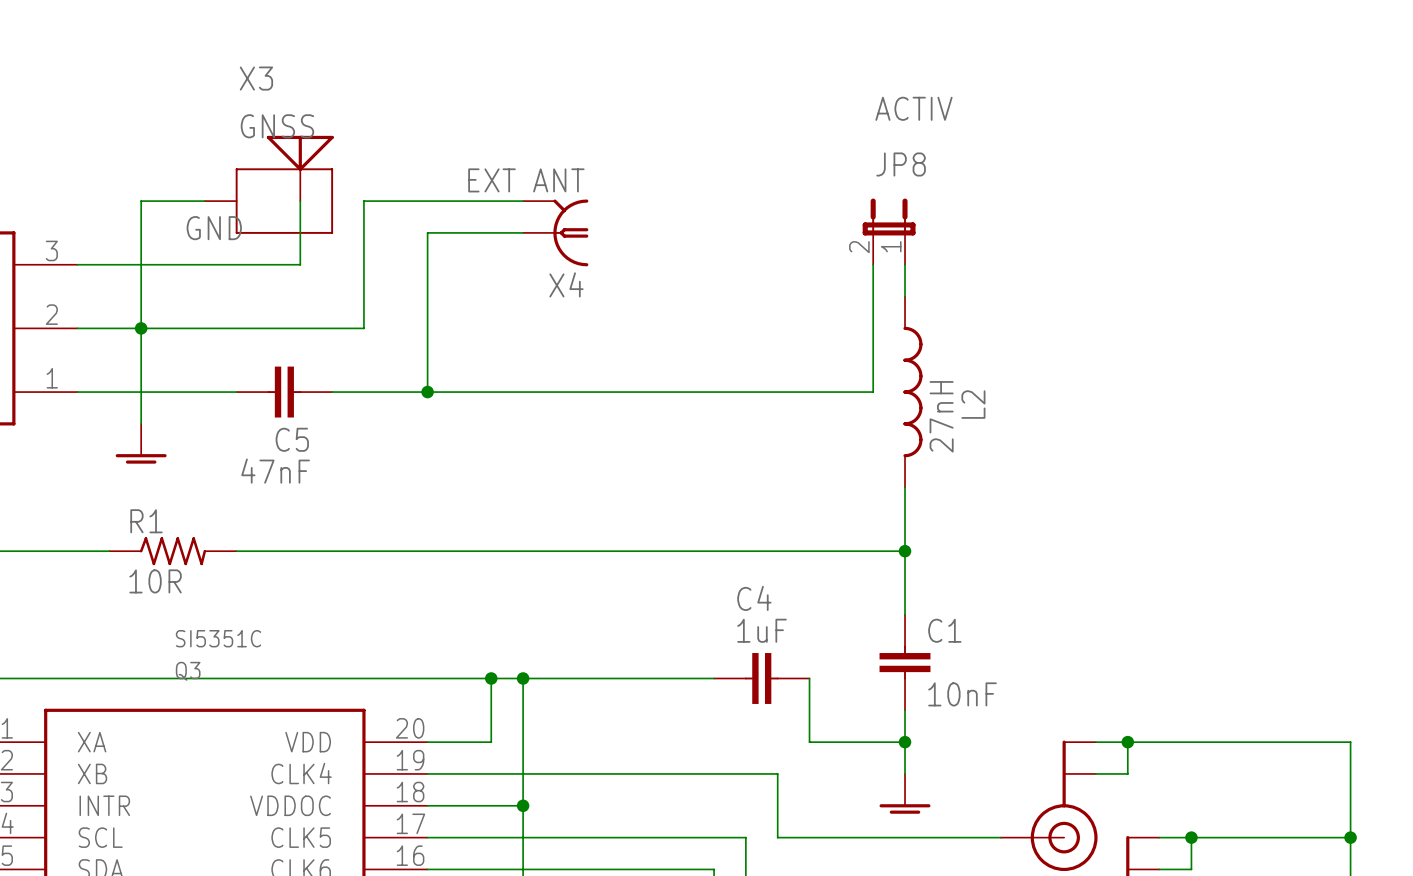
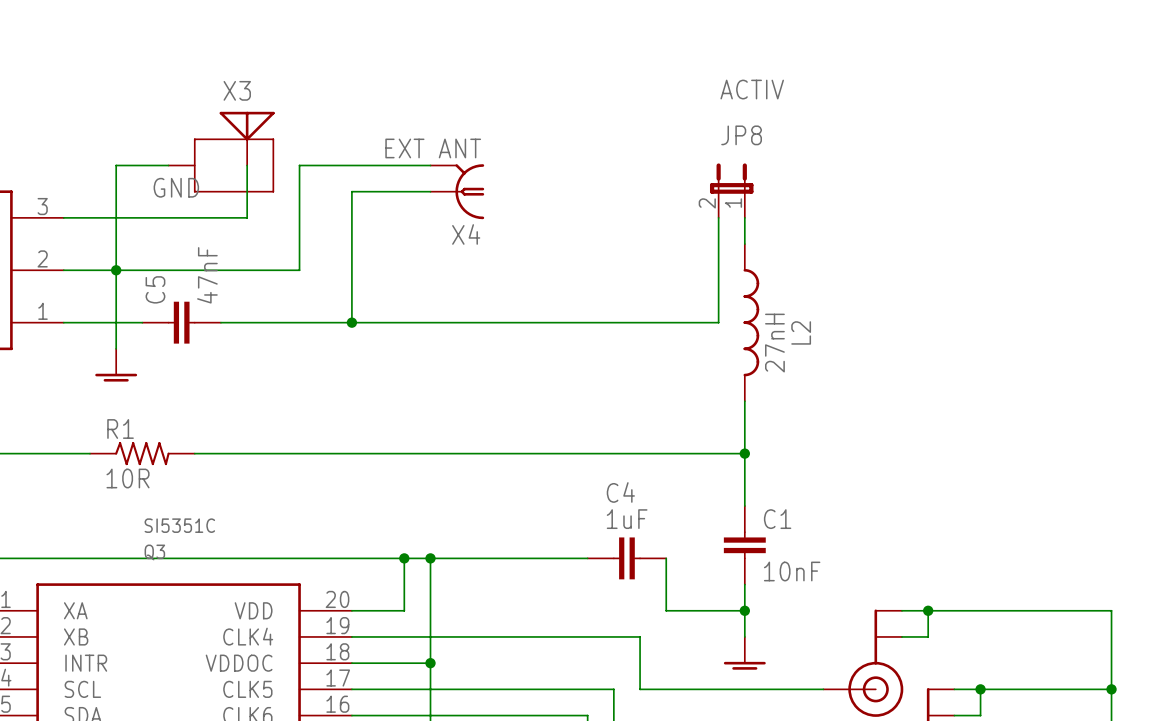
X3 name position: X3 (256, 78) -> X3 (237, 90)
X3 value: GNSS (277, 126) -> none
C5 position: (284, 392) -> (181, 322)
C5 name rotation: 0° (292, 439) -> 90° counterclockwise (155, 289)
C5 name position: C5 (292, 439) -> C5 (155, 289)
C5 value rotation: 0° (275, 471) -> 90° counterclockwise (207, 275)
C5 value position: 47nF (275, 471) -> 47nF (207, 275)

